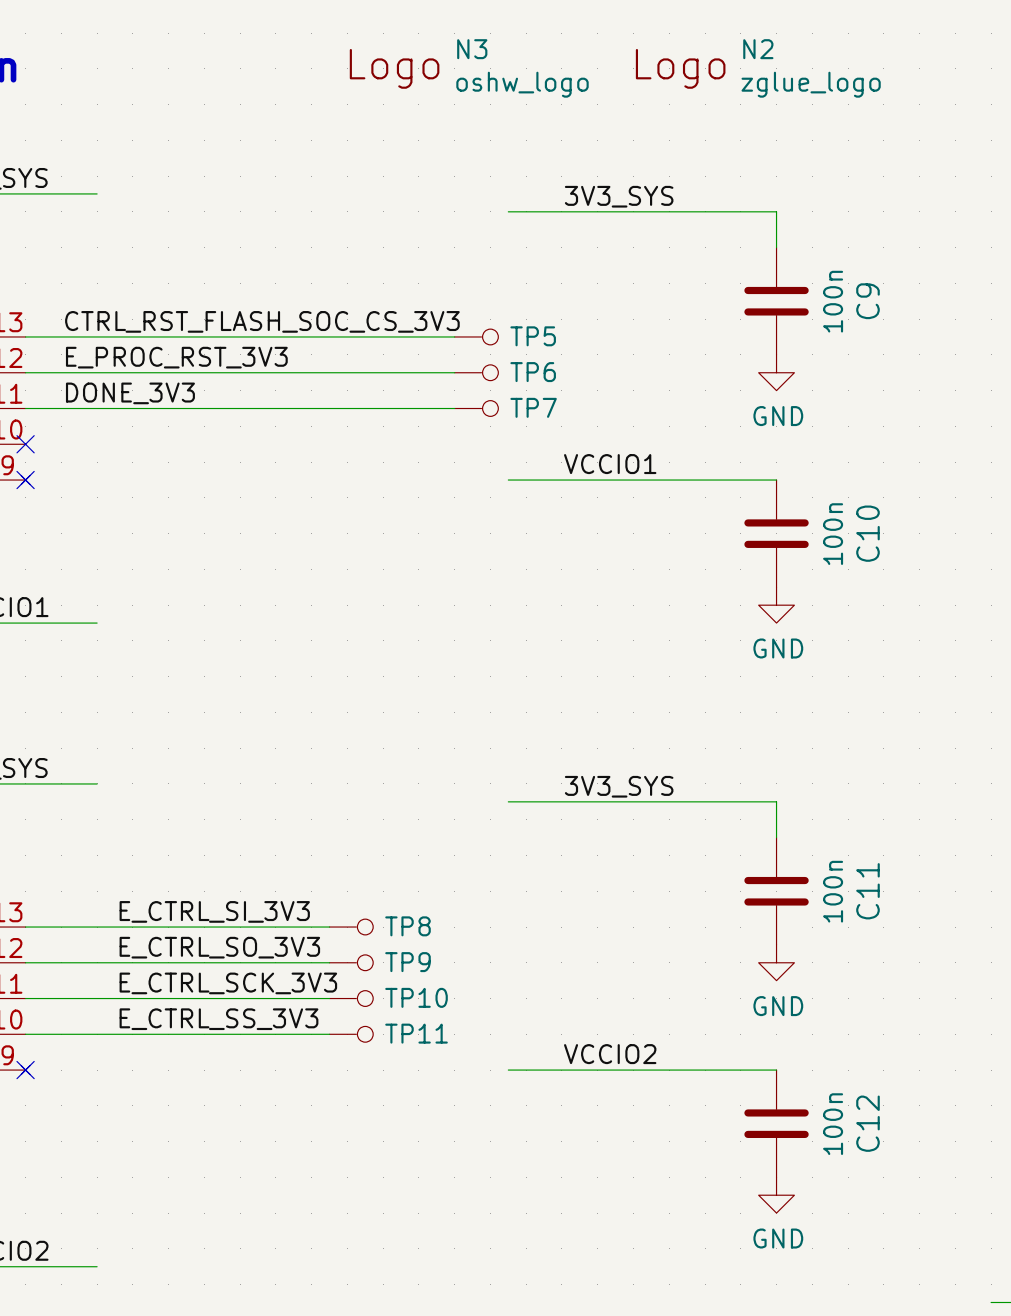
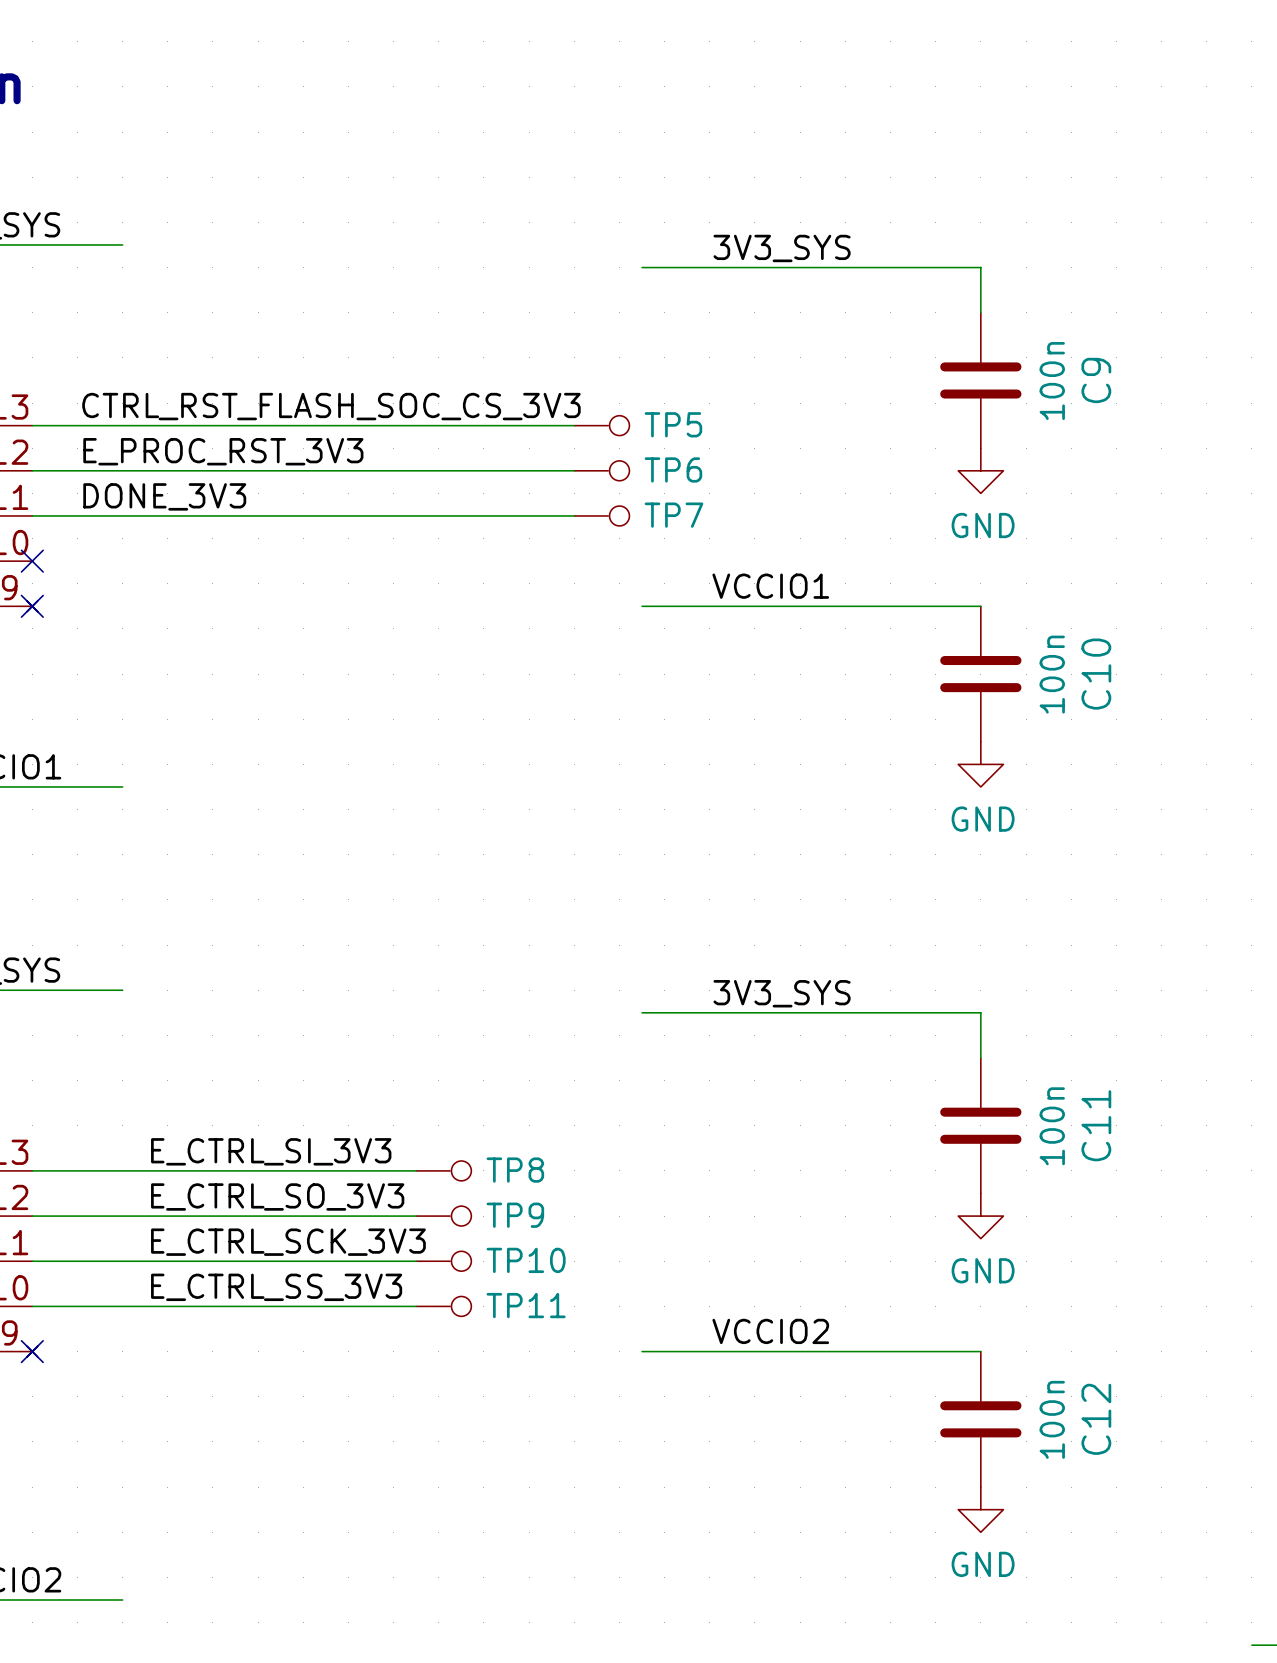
N3: oshw_logo (469, 68) -> none
N2: zglue_logo (758, 68) -> none

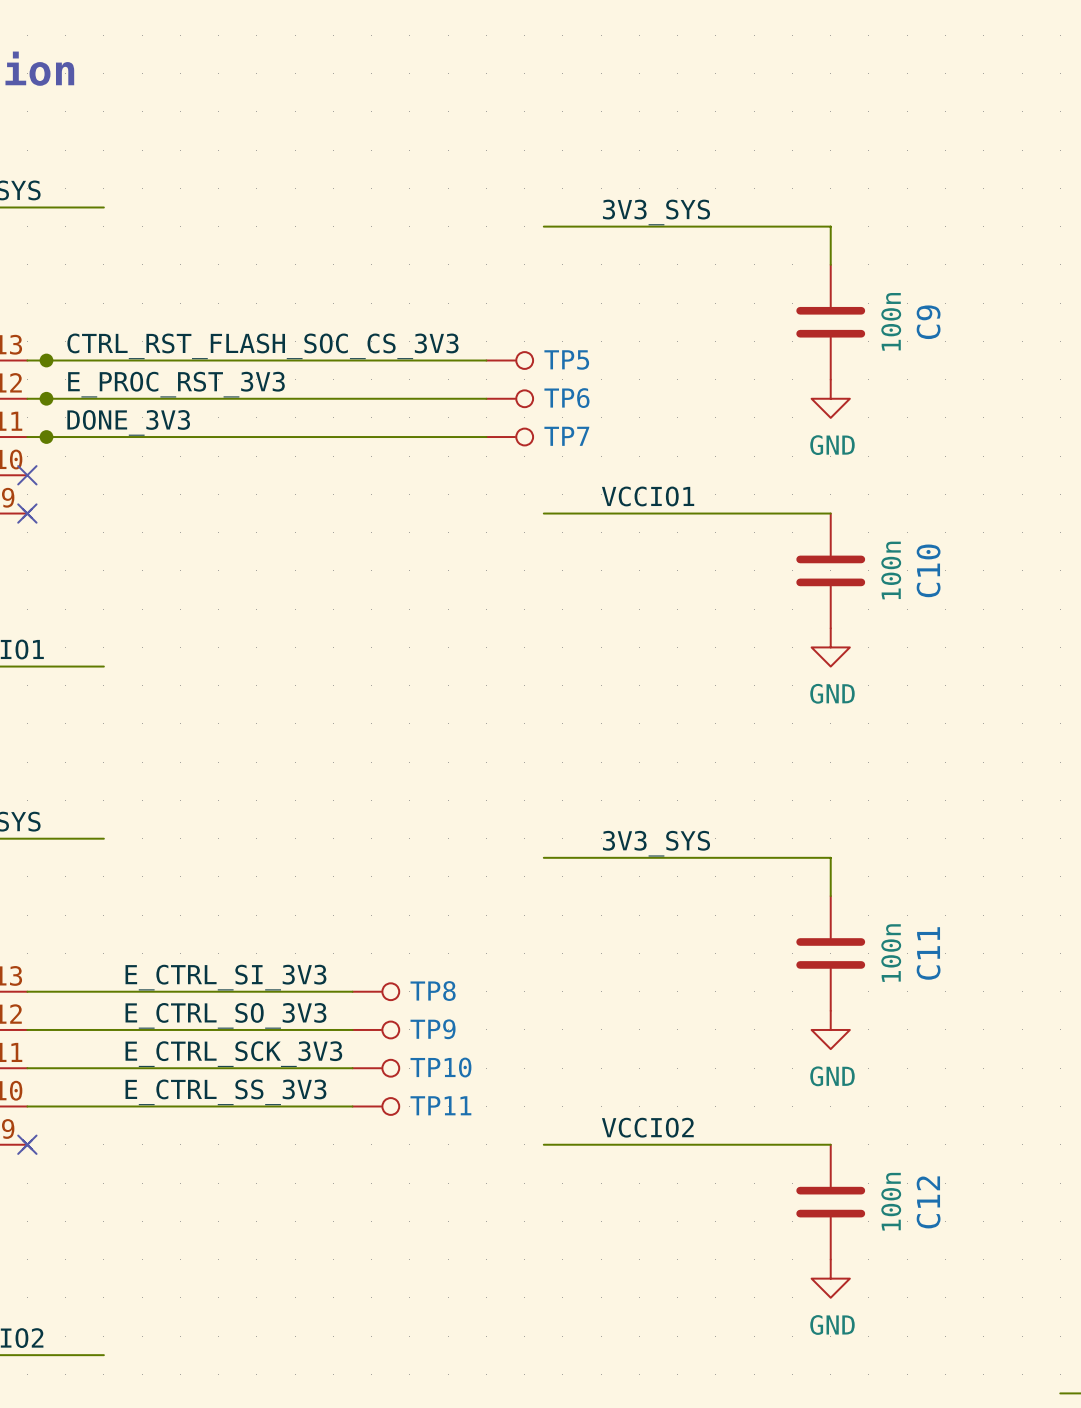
junction: none -> (46, 360)
junction: none -> (46, 398)
junction: none -> (46, 437)

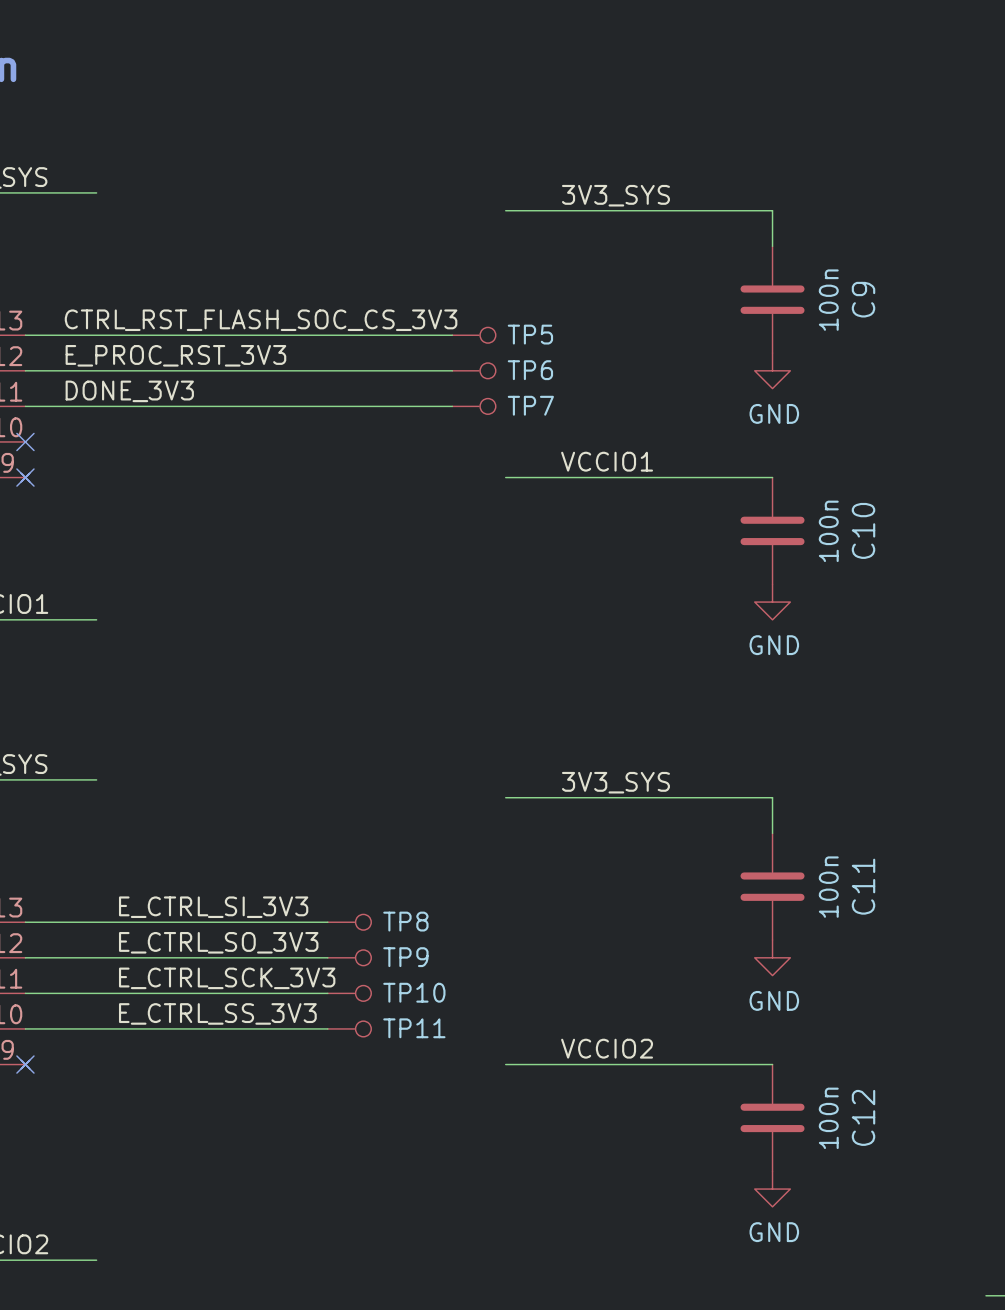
junction: (46, 360) -> none
junction: (46, 398) -> none
junction: (46, 437) -> none

